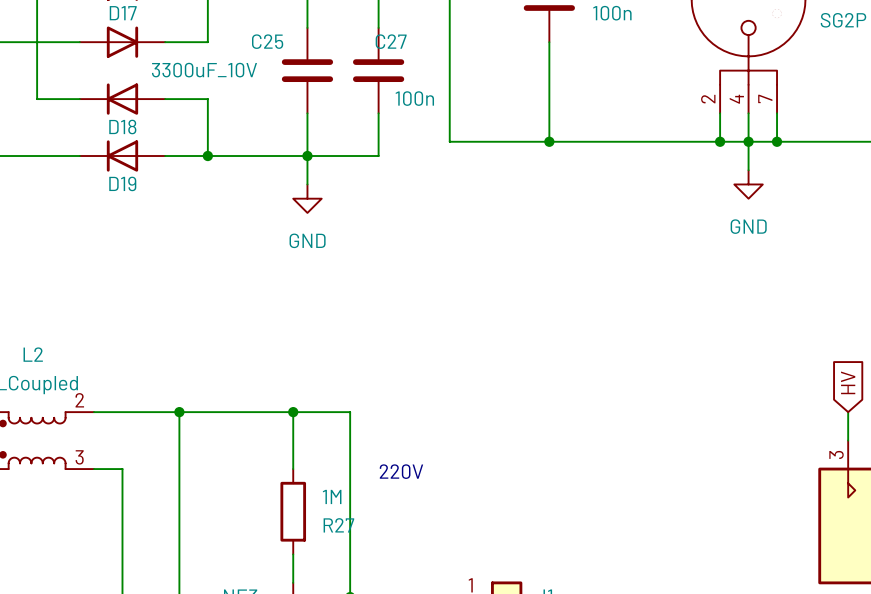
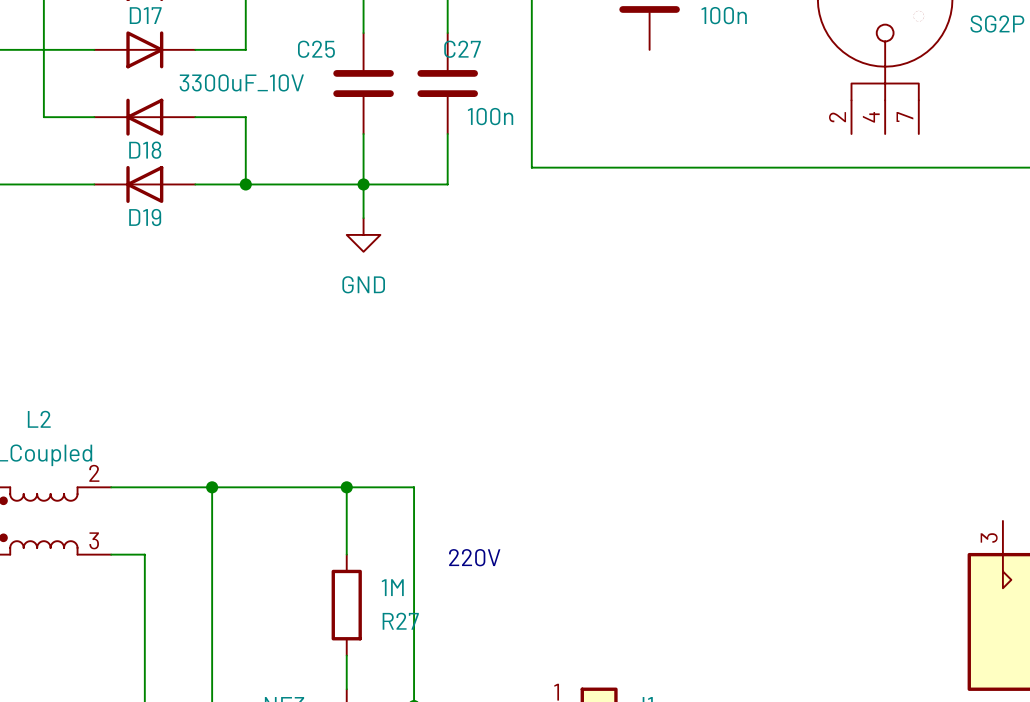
wire: (549, 42) (549, 141) -> none
wire: (720, 113) (720, 141) -> none
wire: (748, 113) (748, 170) -> none
wire: (777, 113) (777, 141) -> none
junction: (549, 141) -> none
junction: (720, 141) -> none
junction: (748, 141) -> none
junction: (777, 141) -> none
power symbol: GND (748, 184) -> none
global label: HV (848, 382) -> none
wire: (848, 412) (848, 440) -> none

